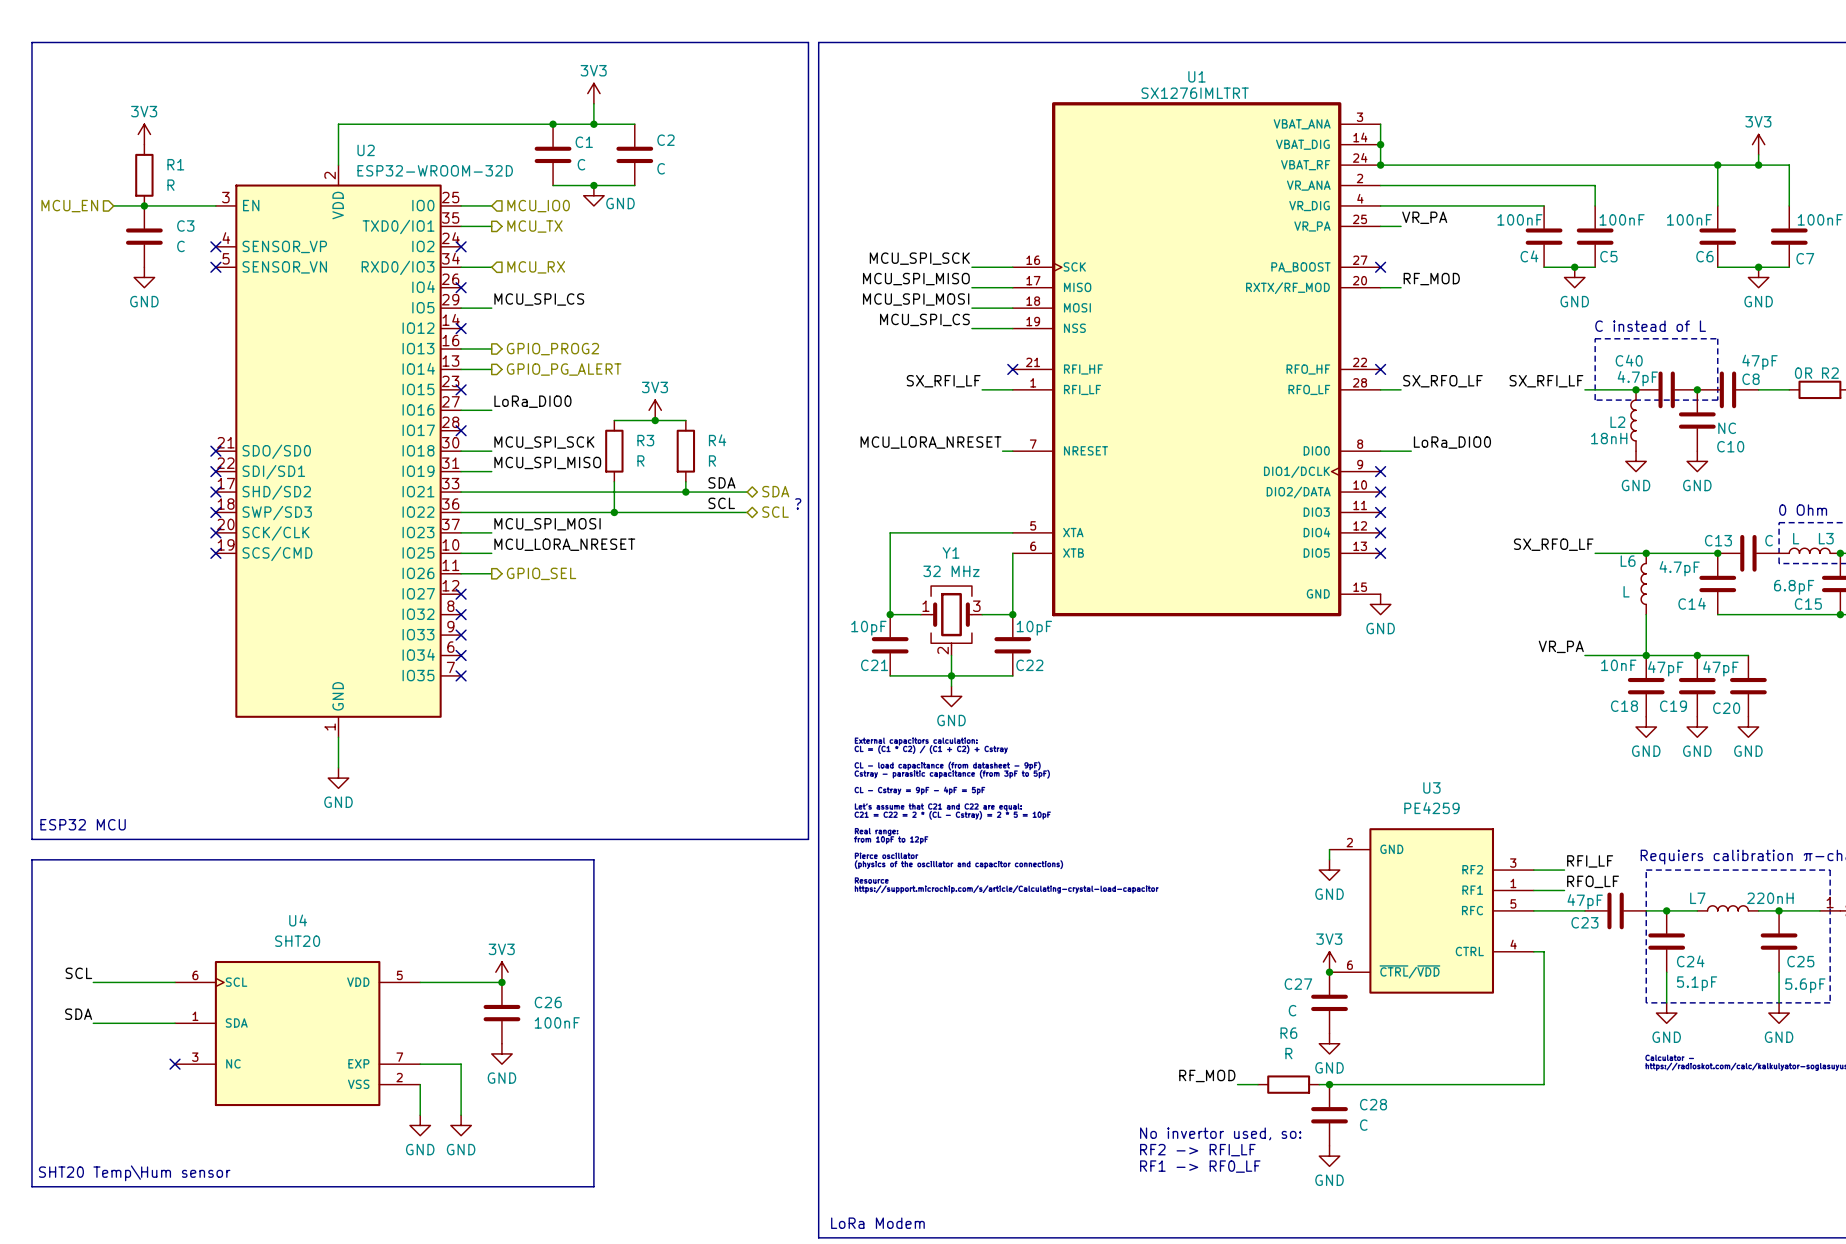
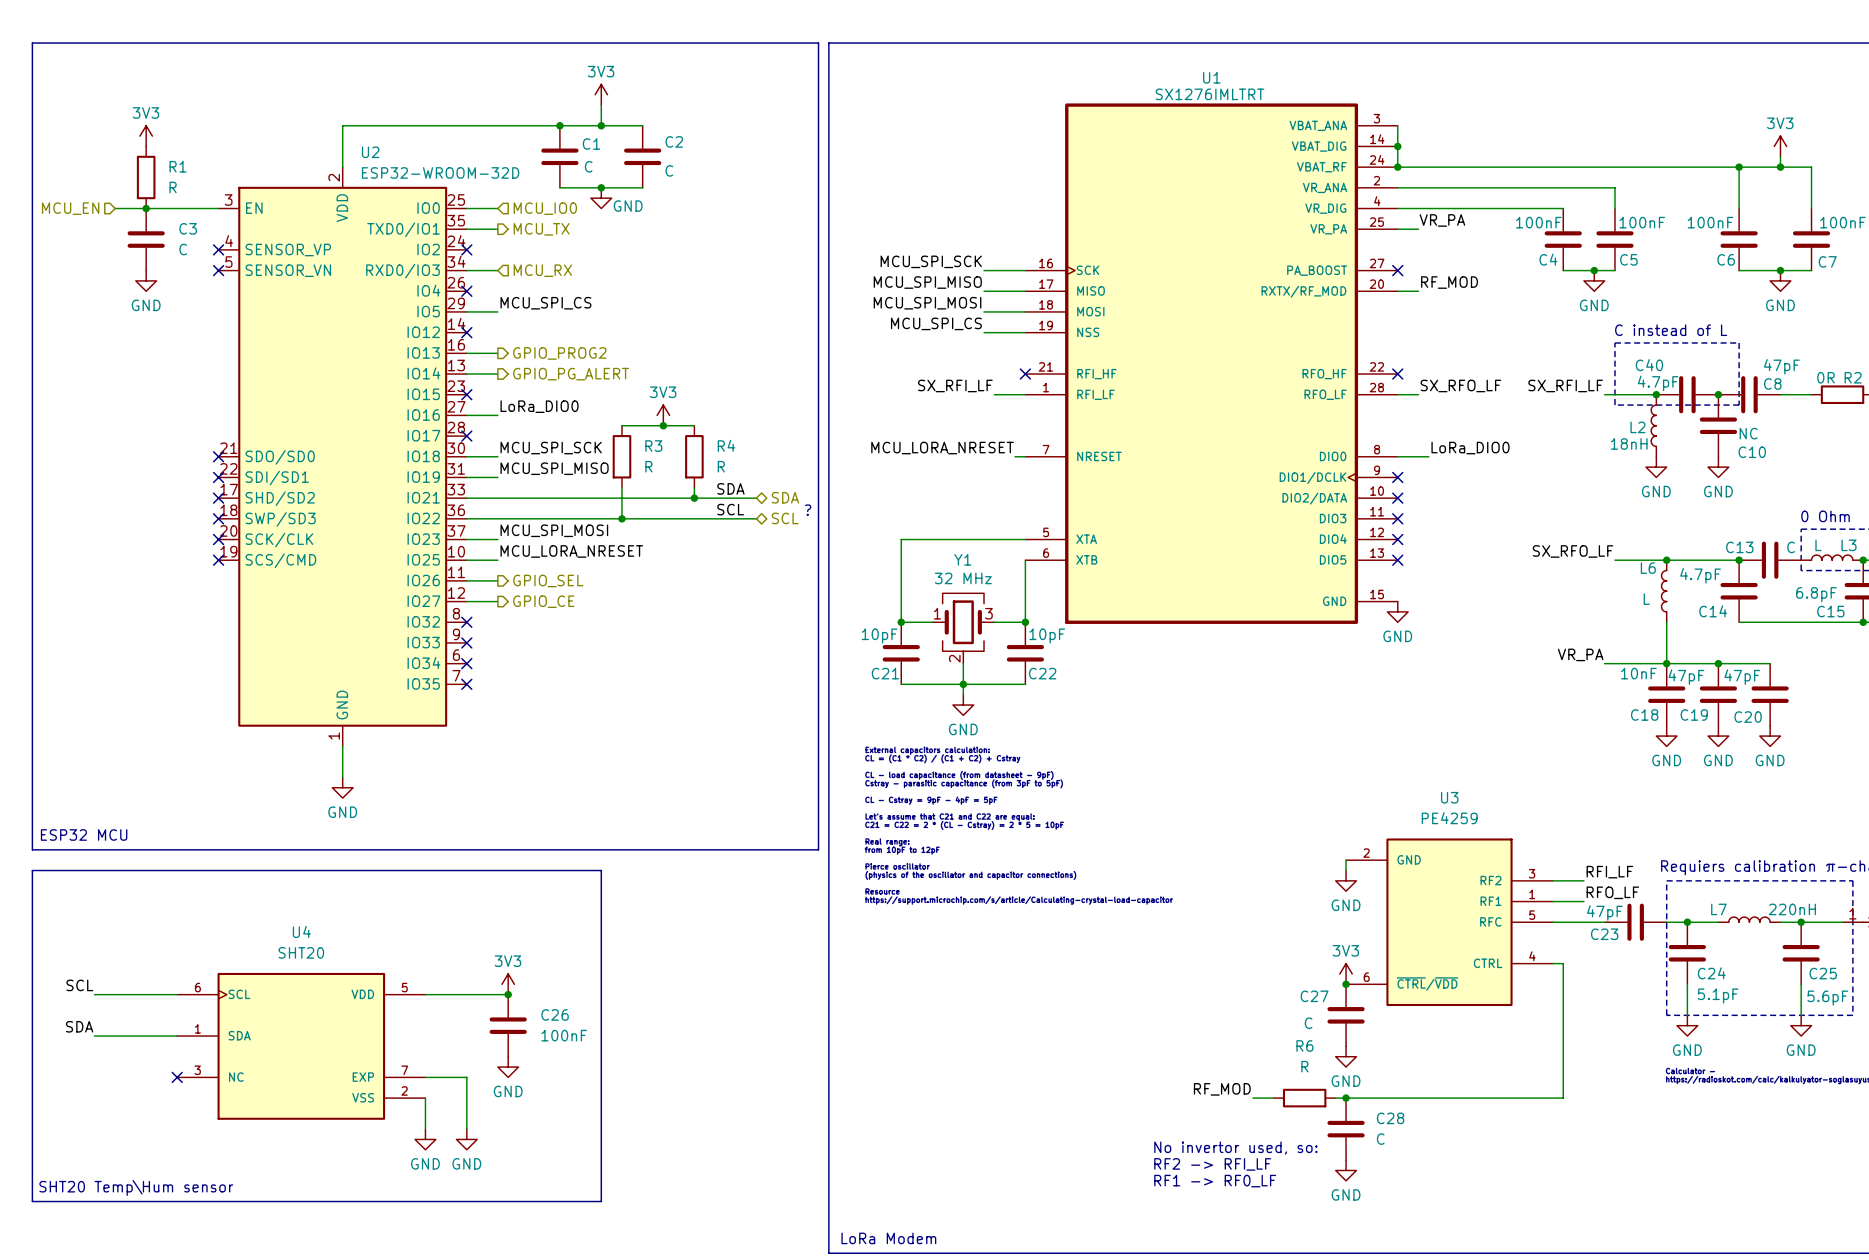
wire: none -> (466, 601) (497, 601)
no-connect mark: (461, 594) -> none
hierarchical label: none -> GPIO_CE (543, 601)

